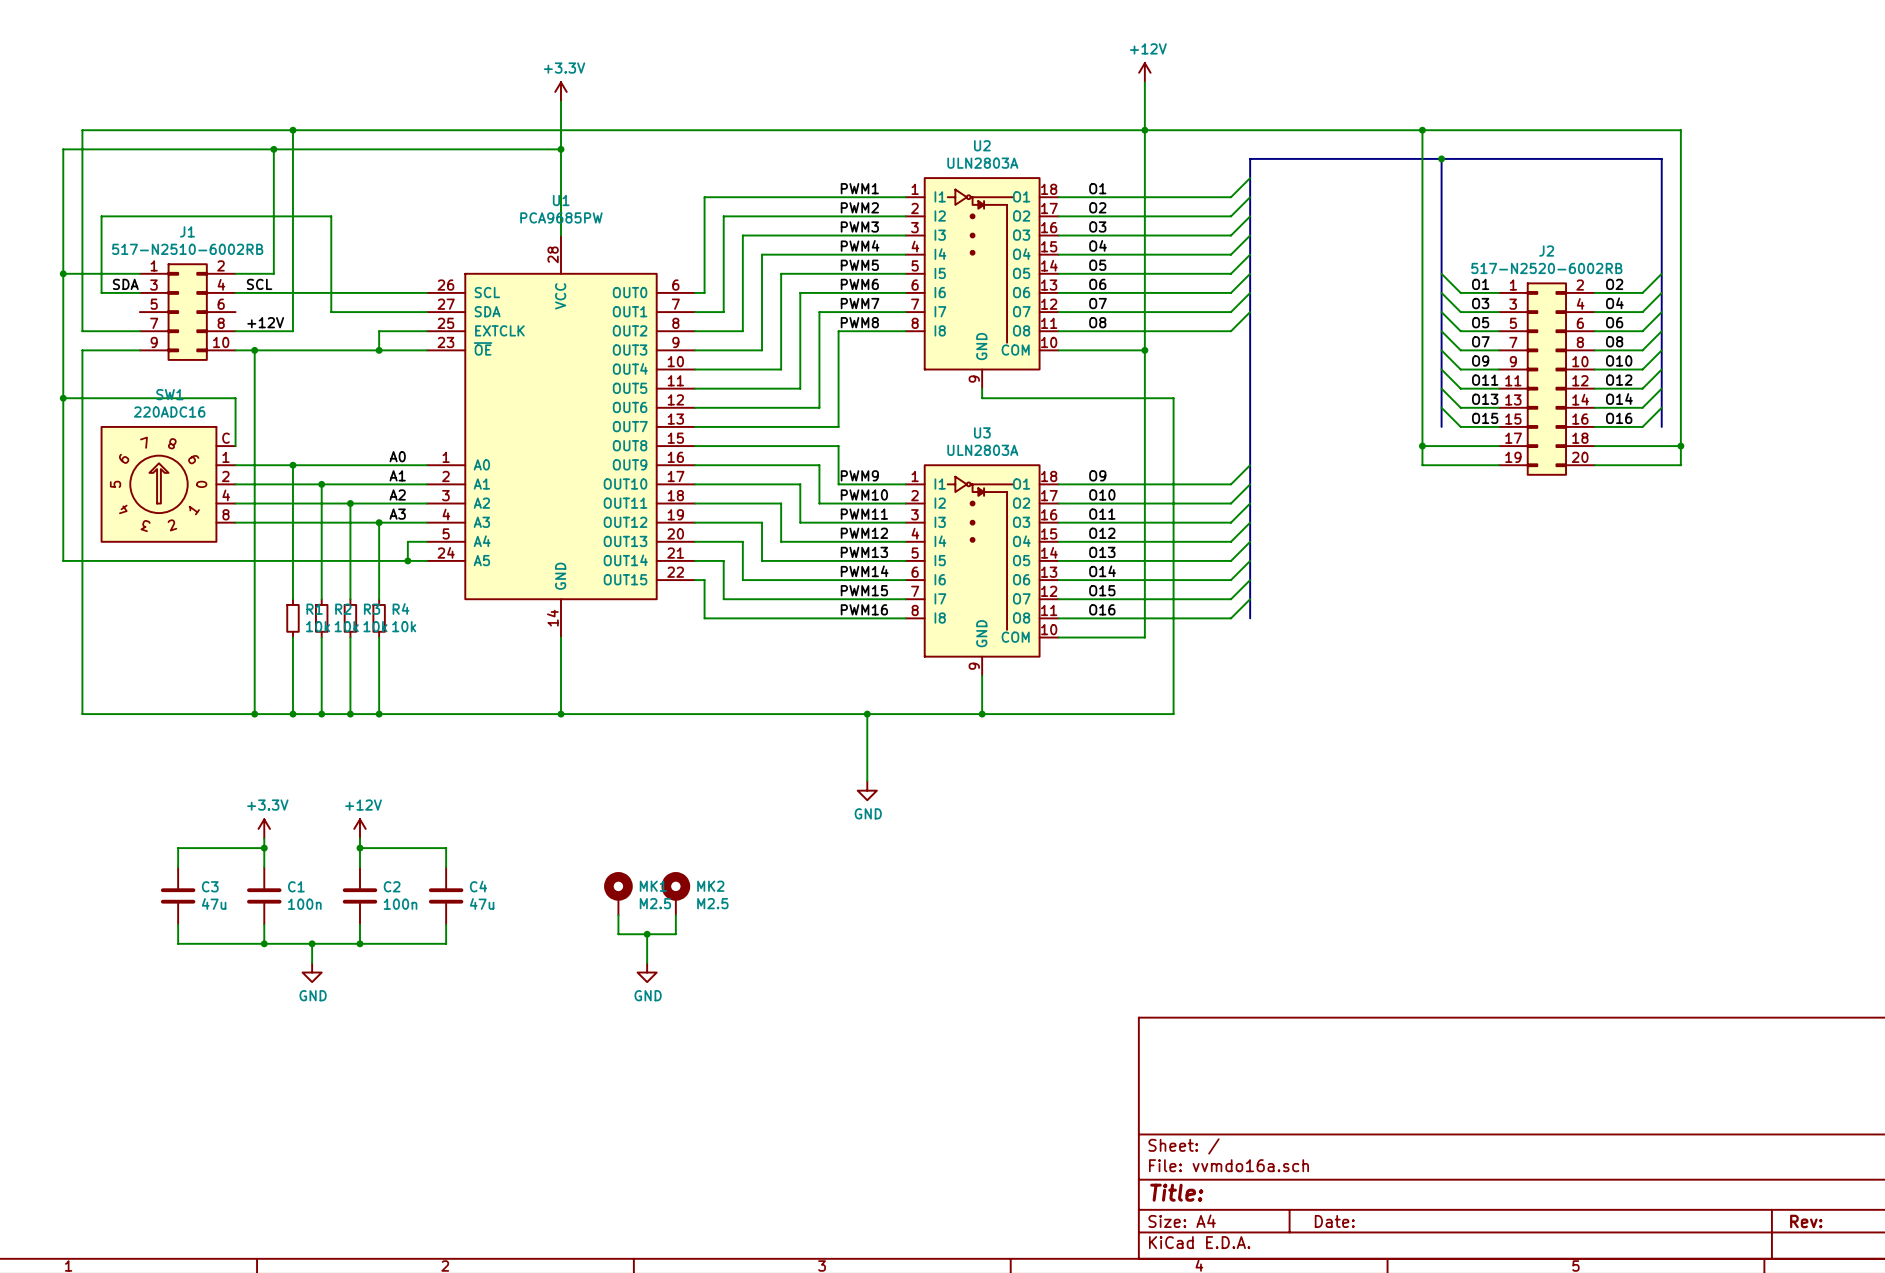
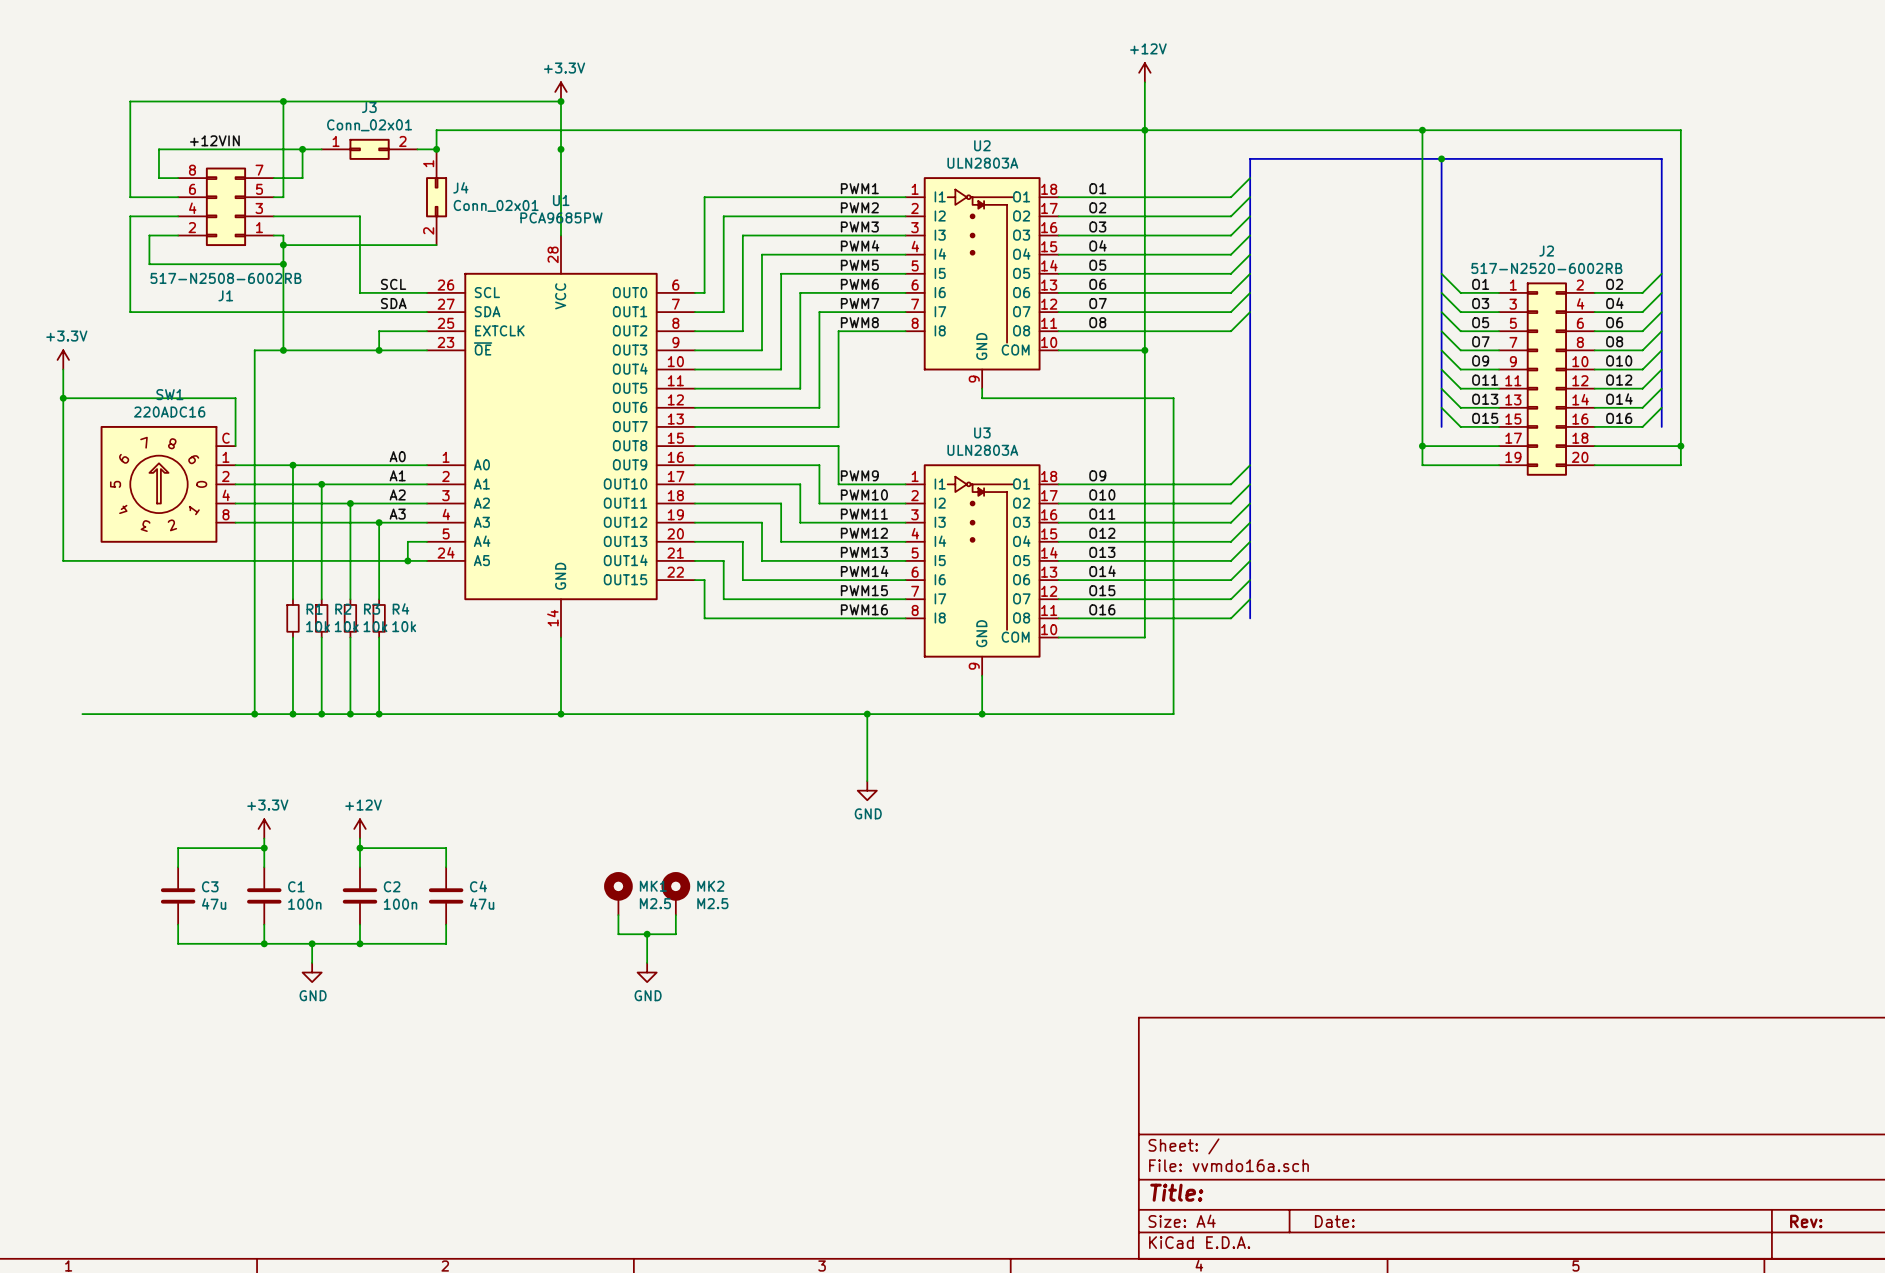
wire: none -> (283, 101) (283, 197) (273, 197)
junction: none -> (283, 101)
wire: none -> (560, 101) (130, 101) (130, 197) (178, 197)
junction: none -> (560, 101)
wire: (292, 130) (292, 331) (235, 331) -> none
junction: (292, 130) -> none
wire: (436, 130) (82, 130) (82, 331) (139, 331) -> none
label: none -> +12VIN (214, 140)
wire: (158, 149) (63, 149) (63, 369) -> (158, 149) (158, 178) (178, 178)
wire: (273, 149) (273, 273) (235, 273) -> none
junction: (273, 149) -> none
wire: none -> (302, 149) (302, 178) (273, 178)
junction: none -> (302, 149)
J3: none -> Conn_02x01 (369, 149)
wire: (436, 149) (560, 149) -> (436, 149) (436, 130)
junction: none -> (436, 149)
J4: none -> Conn_02x01 (436, 197)
wire: (130, 216) (101, 216) (101, 292) (139, 292) -> (130, 216) (130, 312) (331, 312)
wire: (331, 216) (331, 312) -> (331, 216) (359, 216) (359, 292)
J1 name position: J1 (187, 231) -> J1 (225, 295)
wire: none -> (178, 235) (149, 235) (149, 264) (283, 264)
wire: none -> (273, 235) (283, 235) (283, 350)
wire: none -> (283, 245) (436, 245)
junction: none -> (283, 245)
J1 value: 517-N2510-6002RB (187, 249) -> 517-N2508-6002RB (225, 278)
J1 symbol: [139, 263, 236, 361] -> [178, 167, 274, 247]
junction: none -> (283, 264)
wire: (63, 273) (139, 273) -> none
junction: (63, 273) -> none
label: SDA (125, 284) -> none
label position: SCL (259, 284) -> SCL (393, 284)
wire: (235, 292) (359, 292) -> none
label: none -> SDA (393, 303)
label: +12V (265, 322) -> none
wire: (139, 350) (82, 350) (82, 714) -> none
wire: (235, 350) (254, 350) -> none
junction position: (254, 350) -> (283, 350)
power symbol: none -> +3.3V (63, 359)

